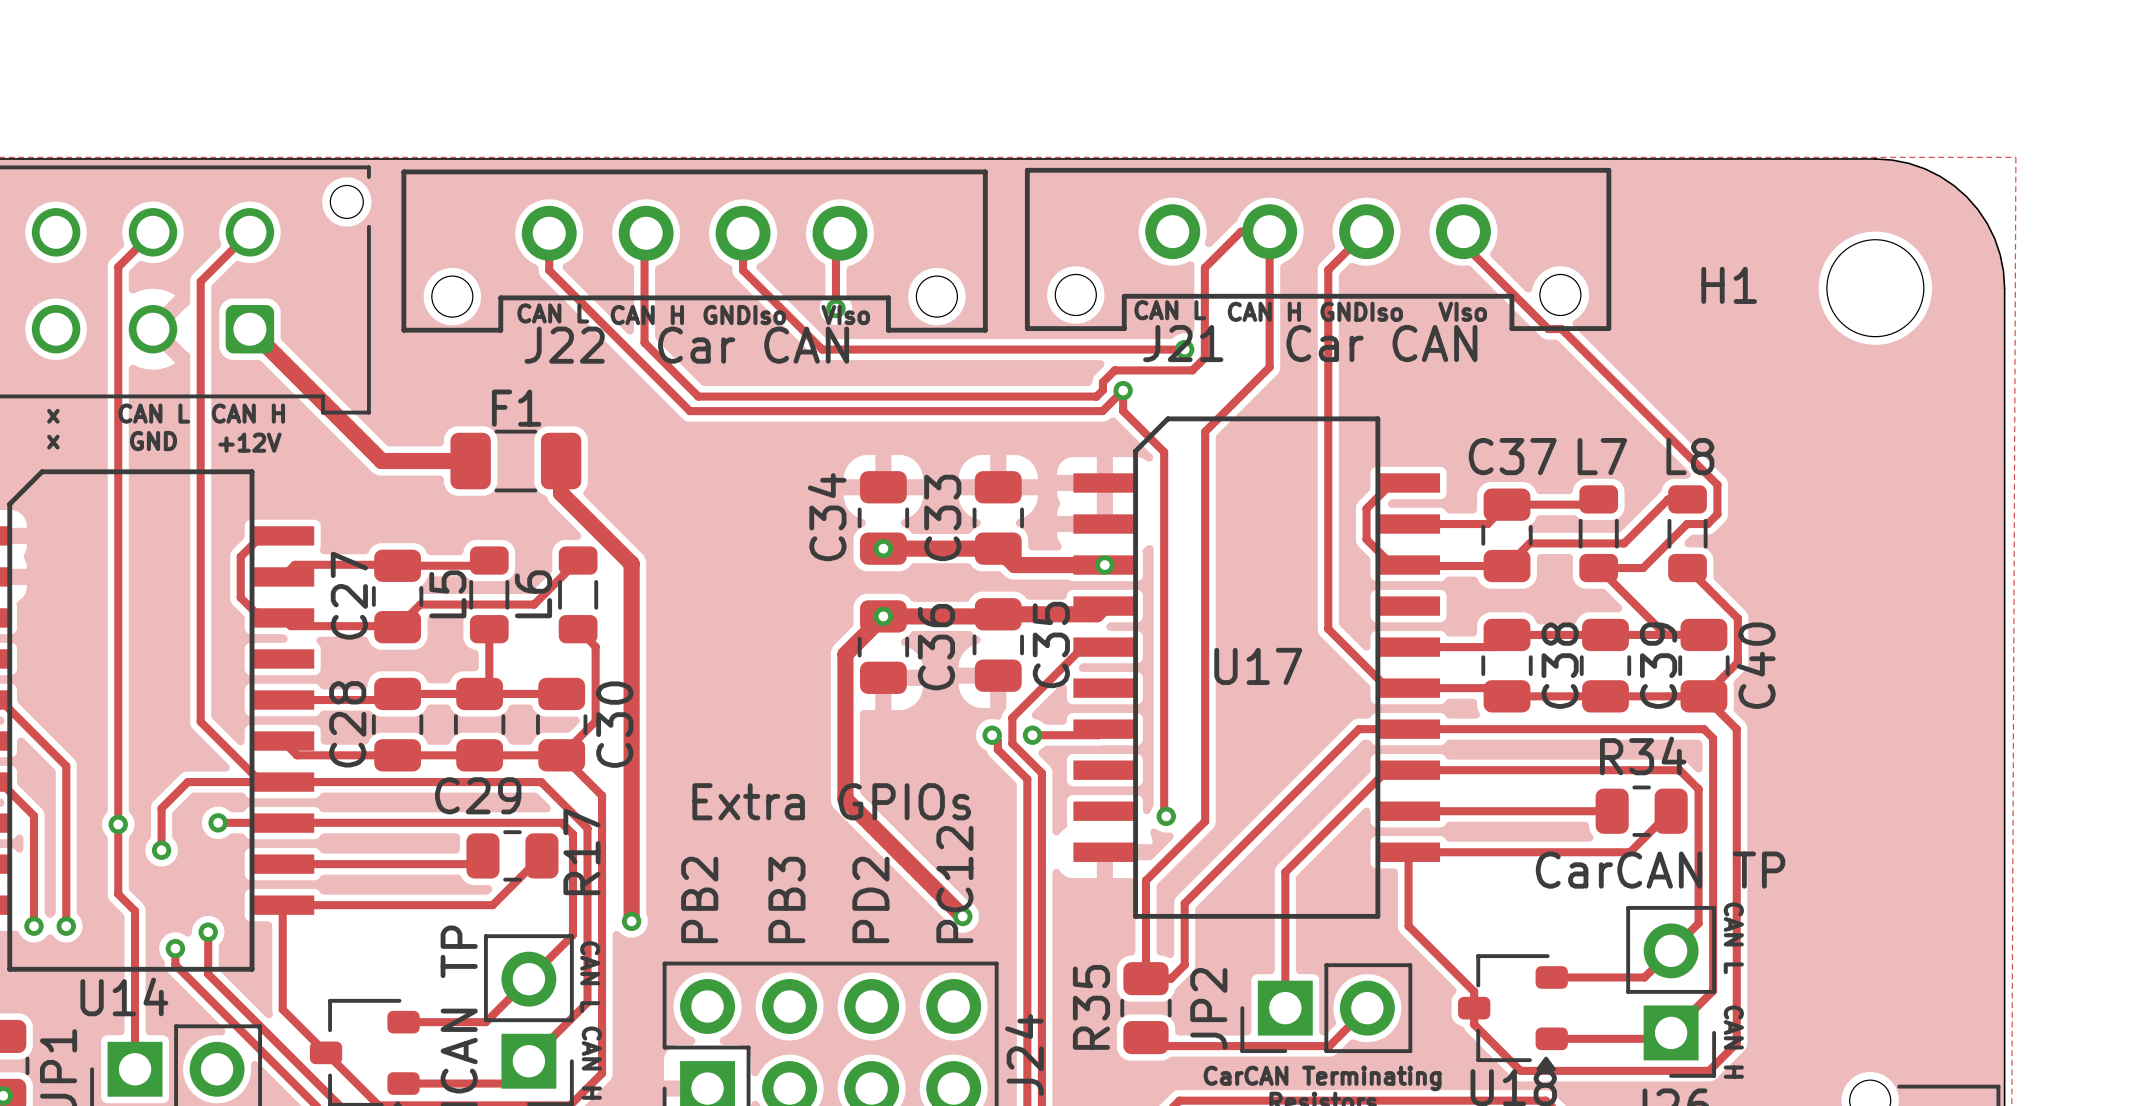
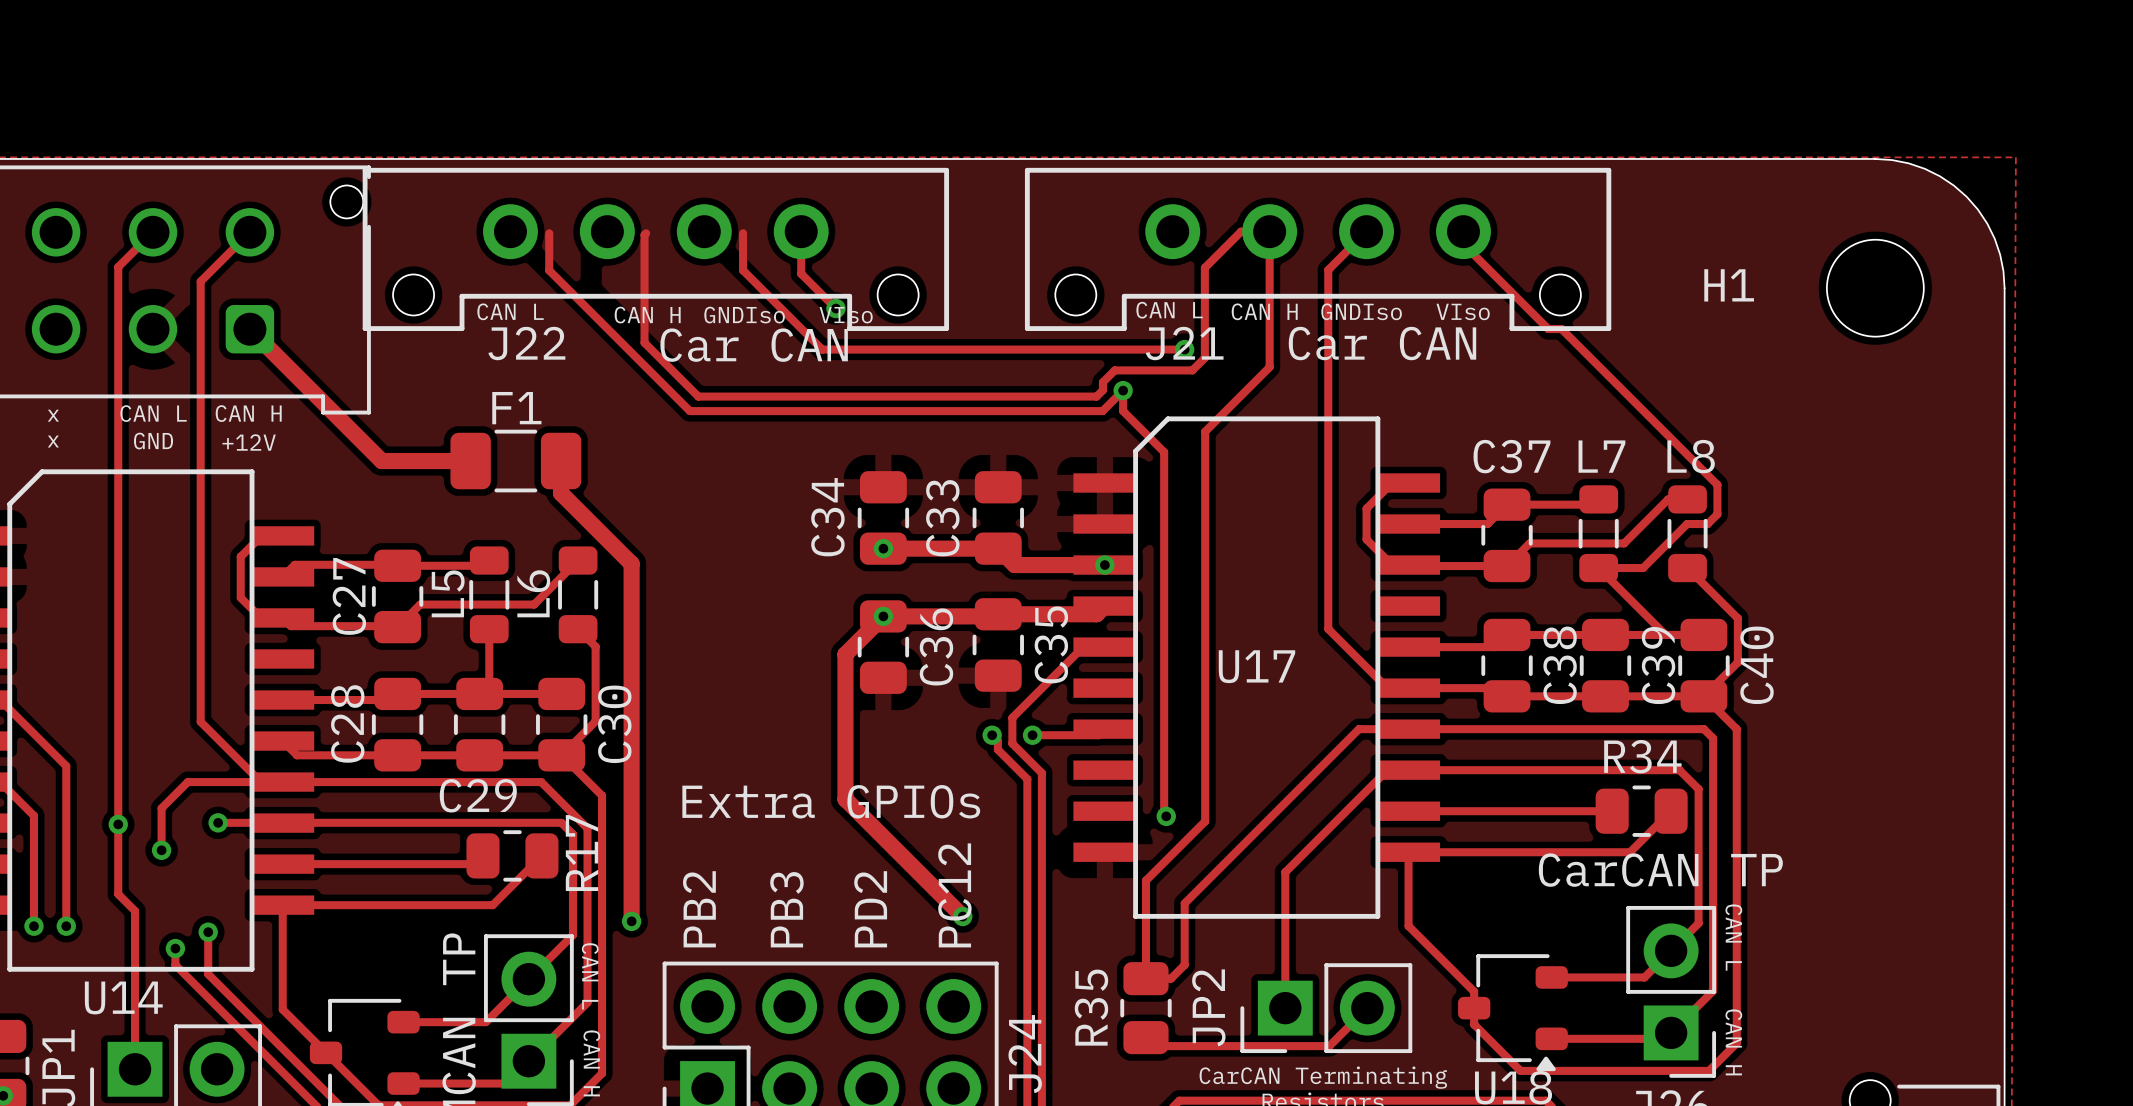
track: (839, 233) (835, 237) (835, 308) -> (801, 231) (801, 273) (835, 308)
J22 position: (694, 251) -> (655, 249)
text position: CAN L (553, 313) -> CAN L (510, 311)

